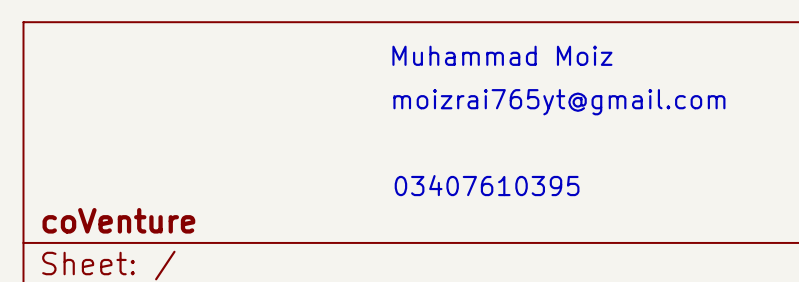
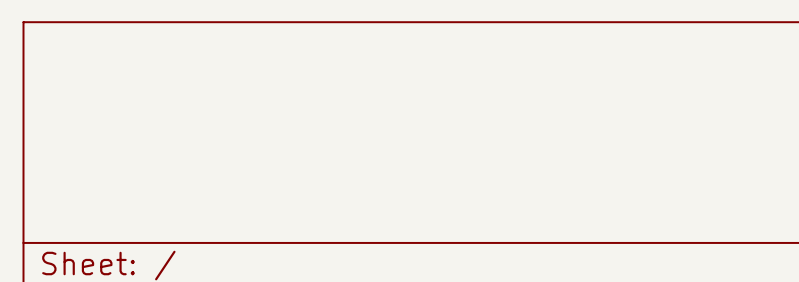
text: Muhammad Moiz (502, 55) -> none
text: moizrai765yt@gmail.com (559, 102) -> none
text: 03407610395 (487, 185) -> none
title block: coVenture (118, 220) -> none

